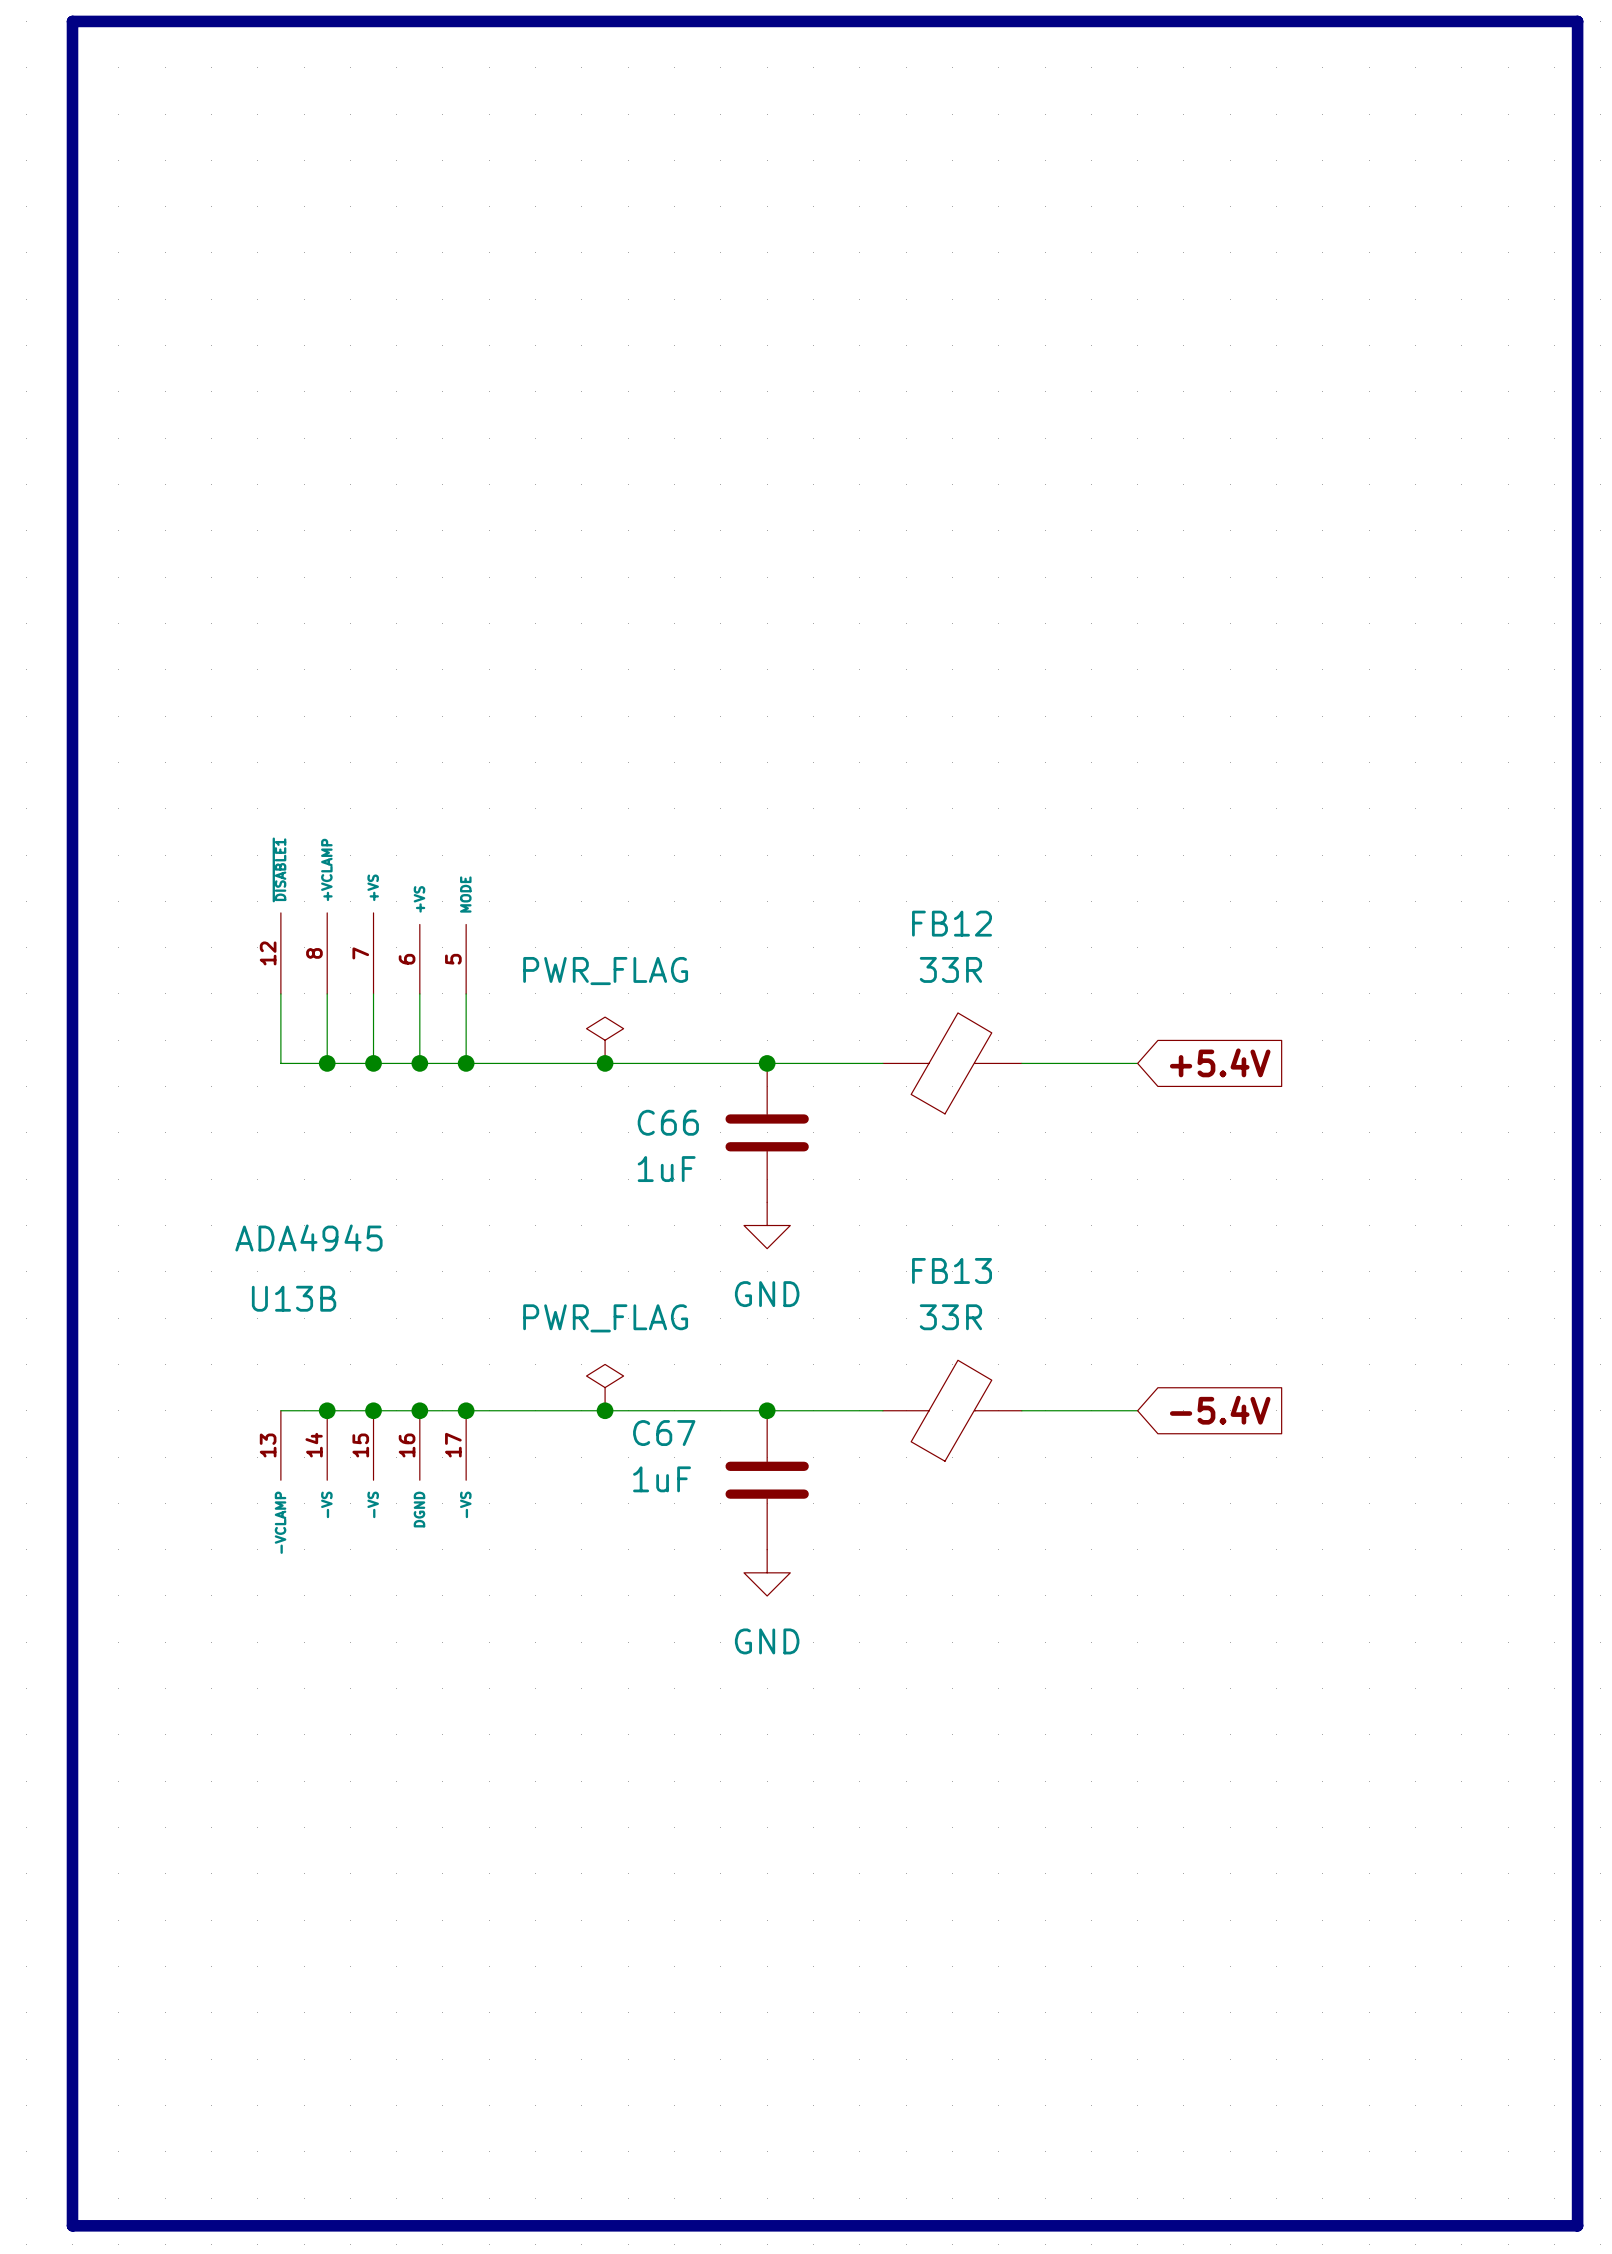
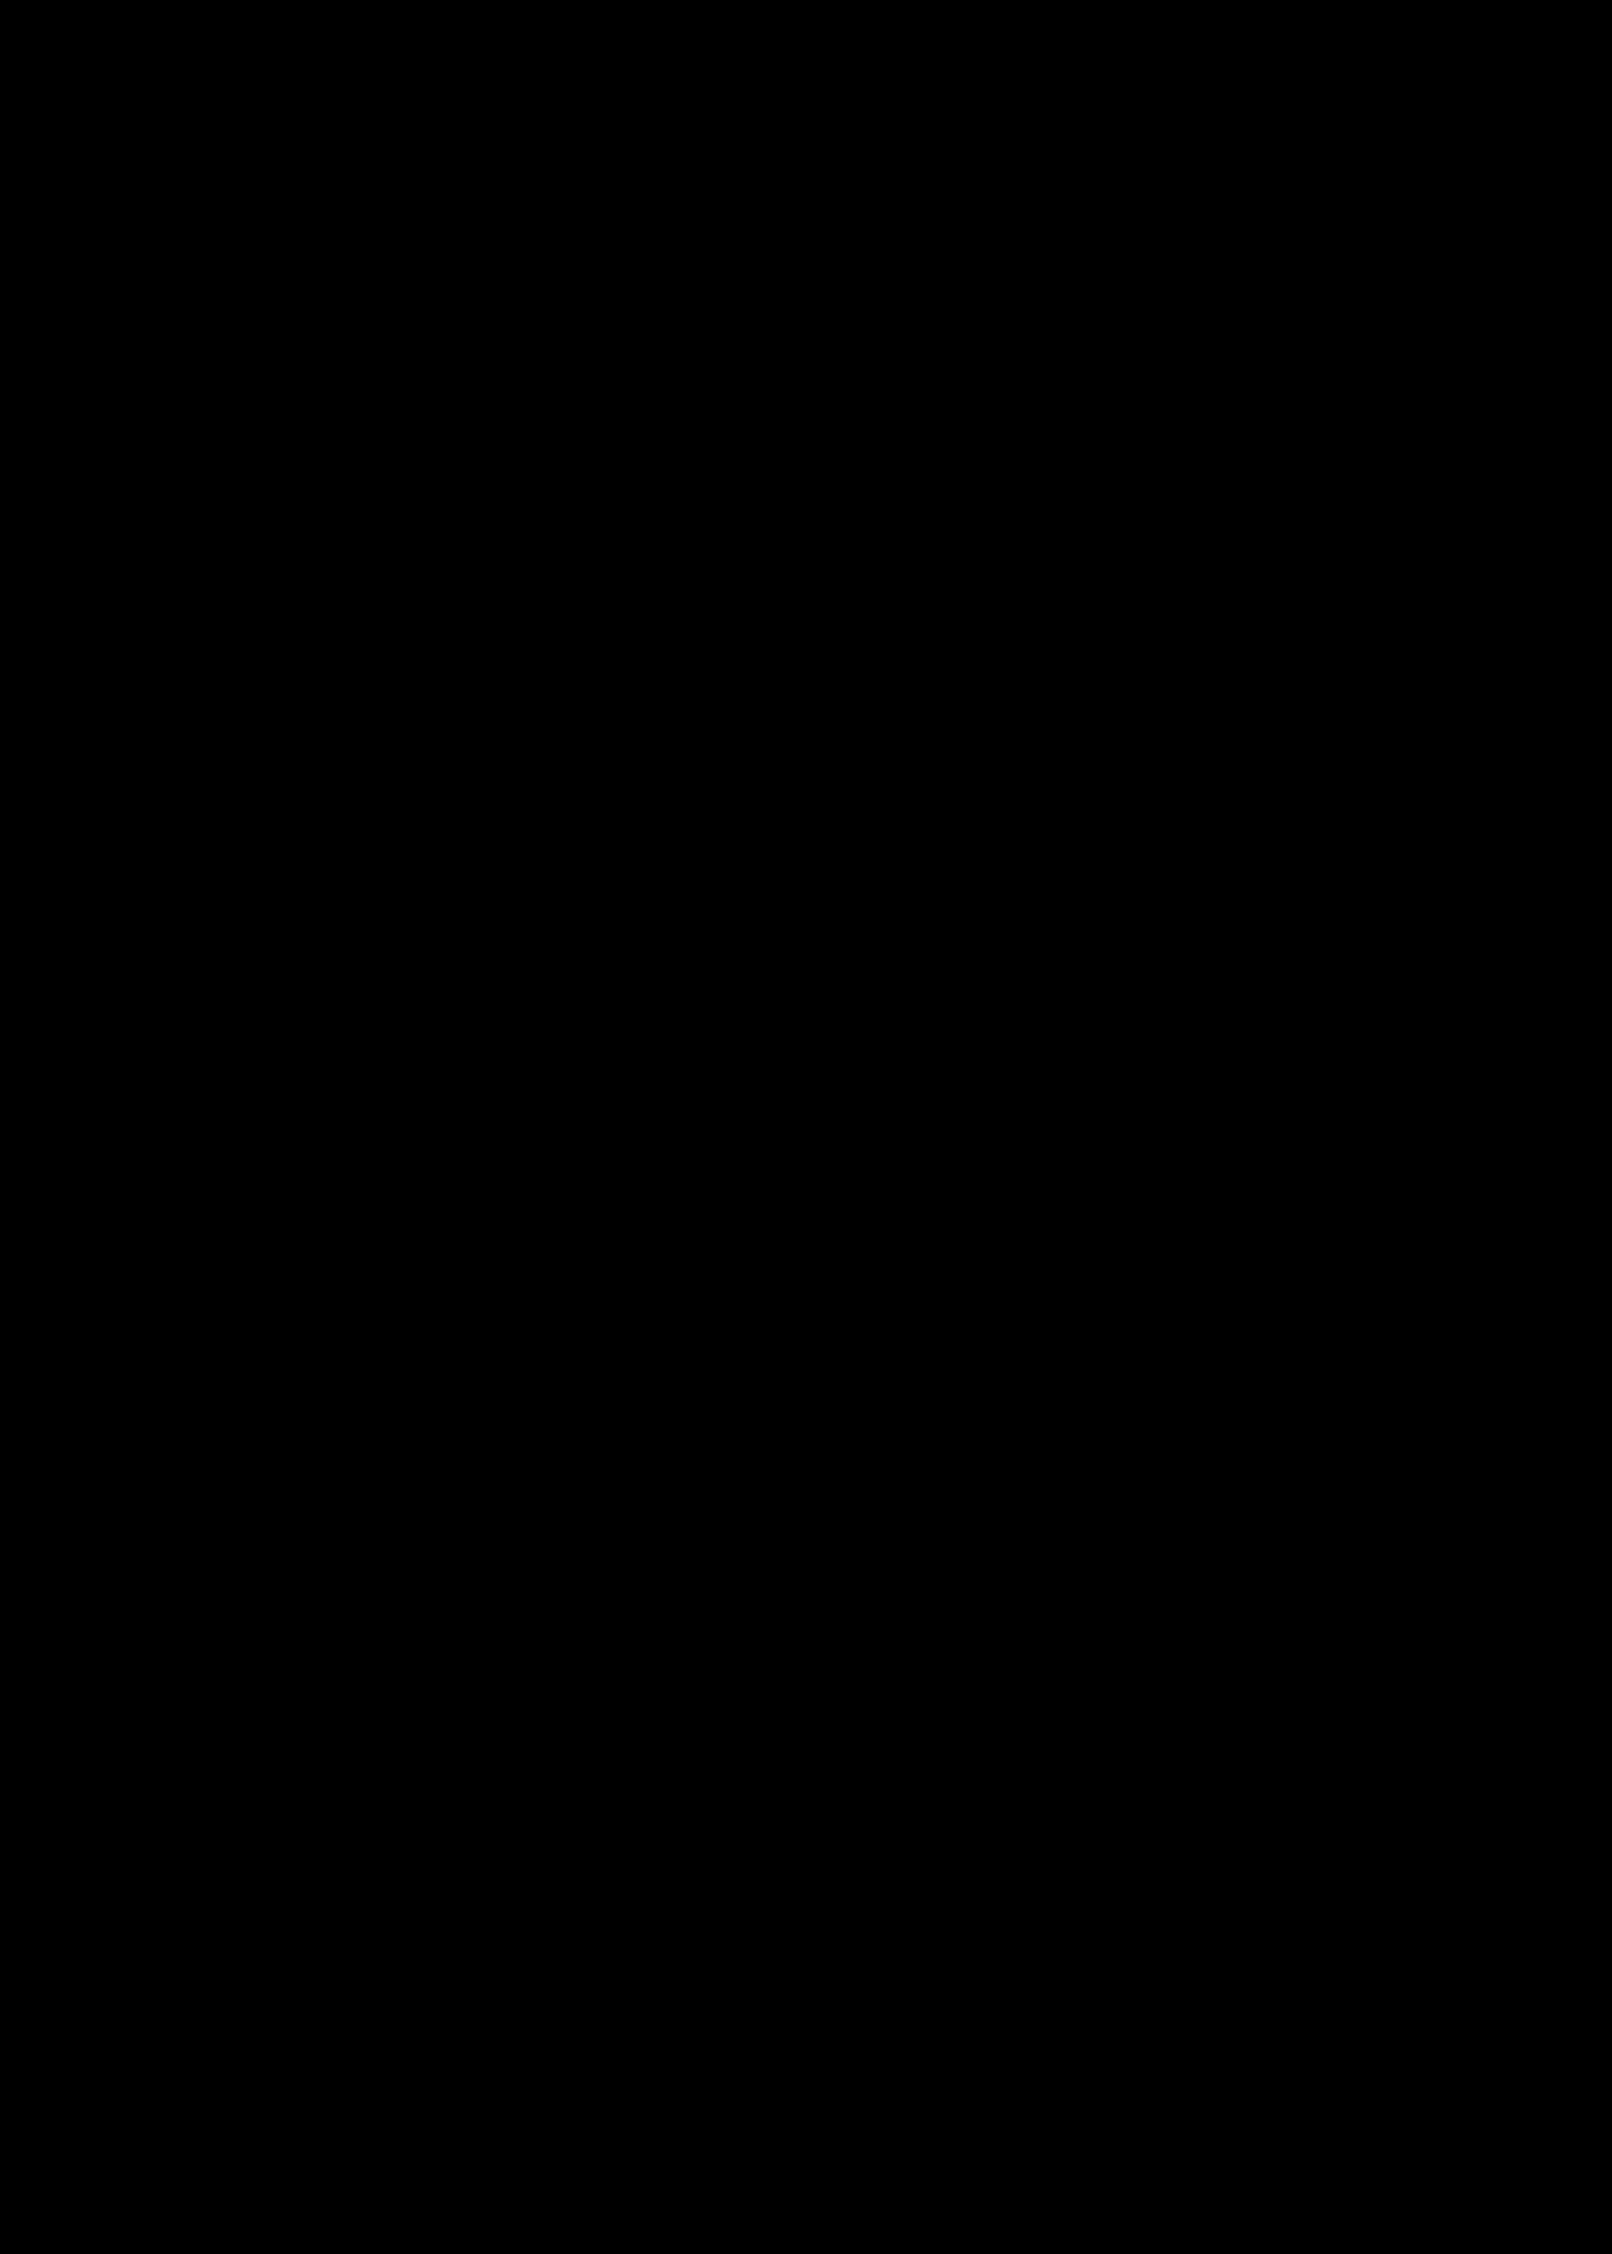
line: (72, 21) (1577, 21) (1577, 2225) (72, 2225) (72, 21) -> none
wire: (280, 993) (280, 1063) (882, 1063) -> none
wire: (327, 993) (327, 1063) -> none
wire: (373, 993) (373, 1063) -> none
wire: (419, 993) (419, 1063) -> none
wire: (466, 993) (466, 1063) -> none
power symbol: PWR_FLAG (605, 1040) -> none
global label: +5.4V (1220, 1062) -> none
junction: (327, 1063) -> none
junction: (373, 1063) -> none
junction: (419, 1063) -> none
junction: (466, 1063) -> none
junction: (605, 1063) -> none
junction: (767, 1063) -> none
FB12: 33R (952, 1063) -> none
wire: (1021, 1063) (1137, 1063) -> none
C66: 1uF (767, 1132) -> none
U13B: ADA4945 (373, 1196) -> none
power symbol: GND (767, 1225) -> none
power symbol: PWR_FLAG (605, 1387) -> none
wire: (280, 1410) (882, 1410) -> none
junction: (327, 1410) -> none
junction: (373, 1410) -> none
junction: (419, 1410) -> none
junction: (466, 1410) -> none
junction: (605, 1410) -> none
junction: (767, 1410) -> none
FB13: 33R (952, 1410) -> none
wire: (1021, 1410) (1137, 1410) -> none
global label: -5.4V (1220, 1410) -> none
C67: 1uF (767, 1480) -> none
power symbol: GND (767, 1572) -> none

